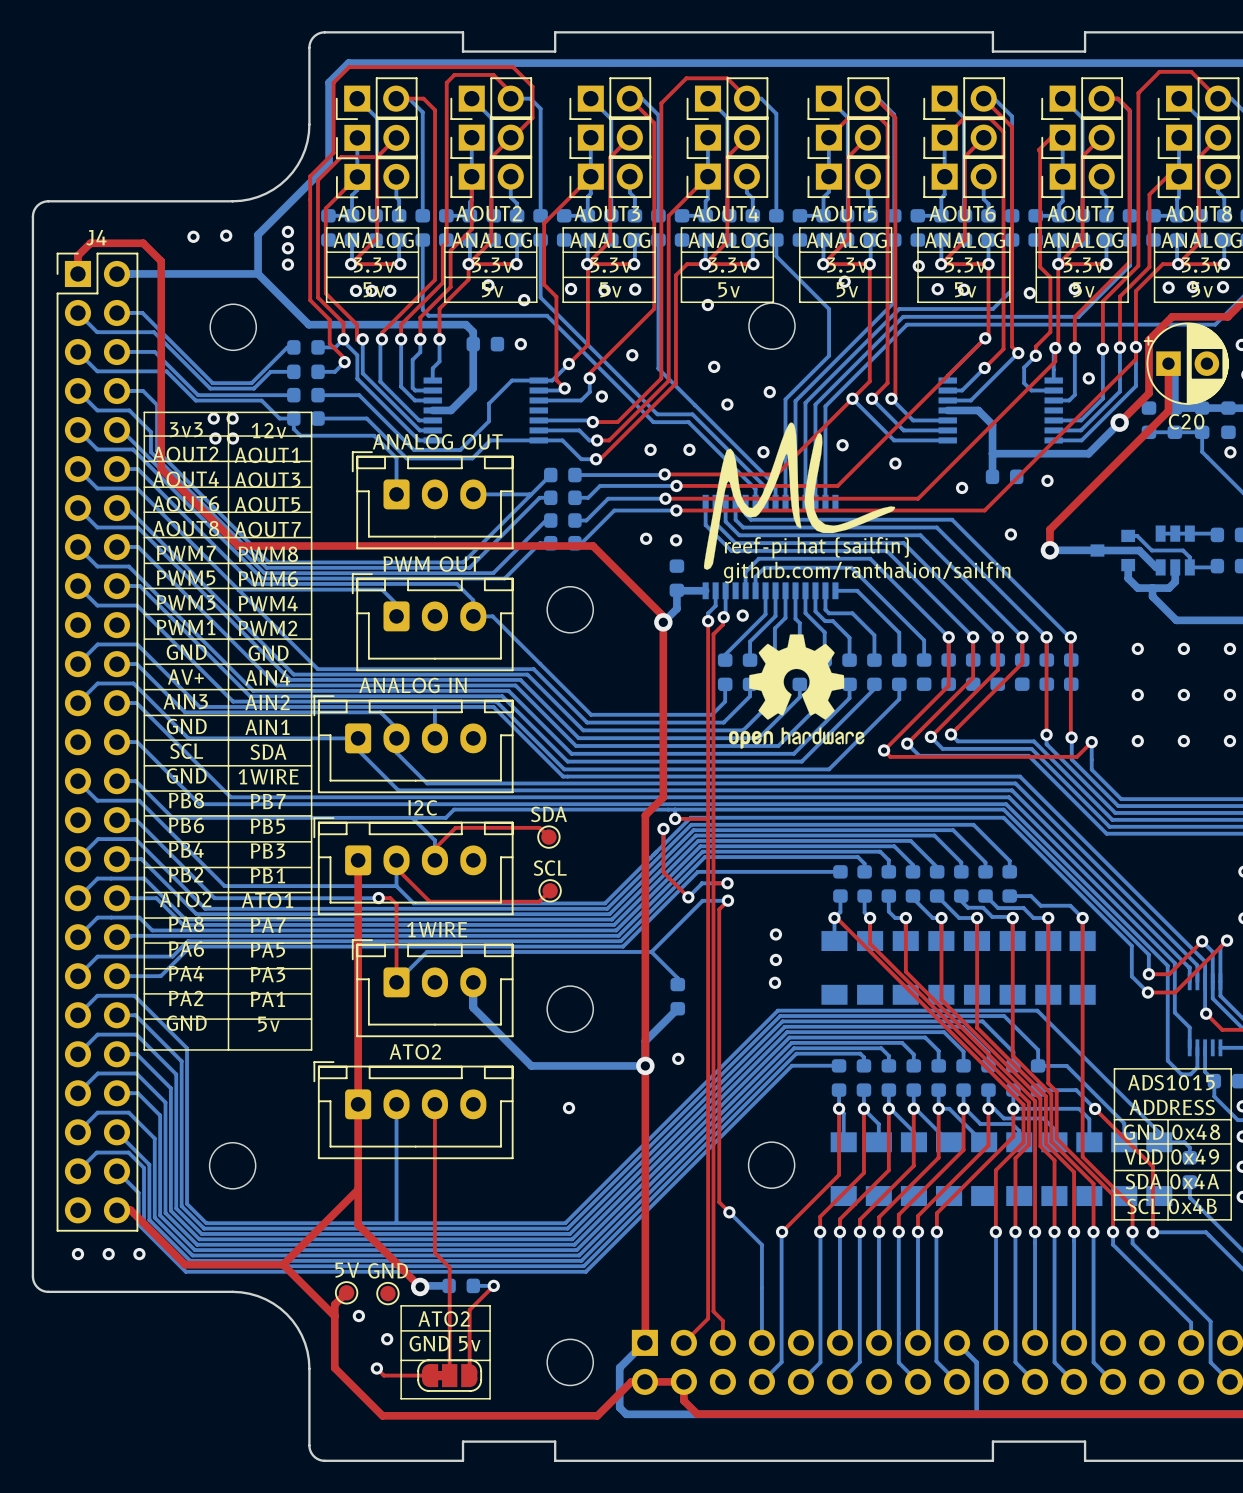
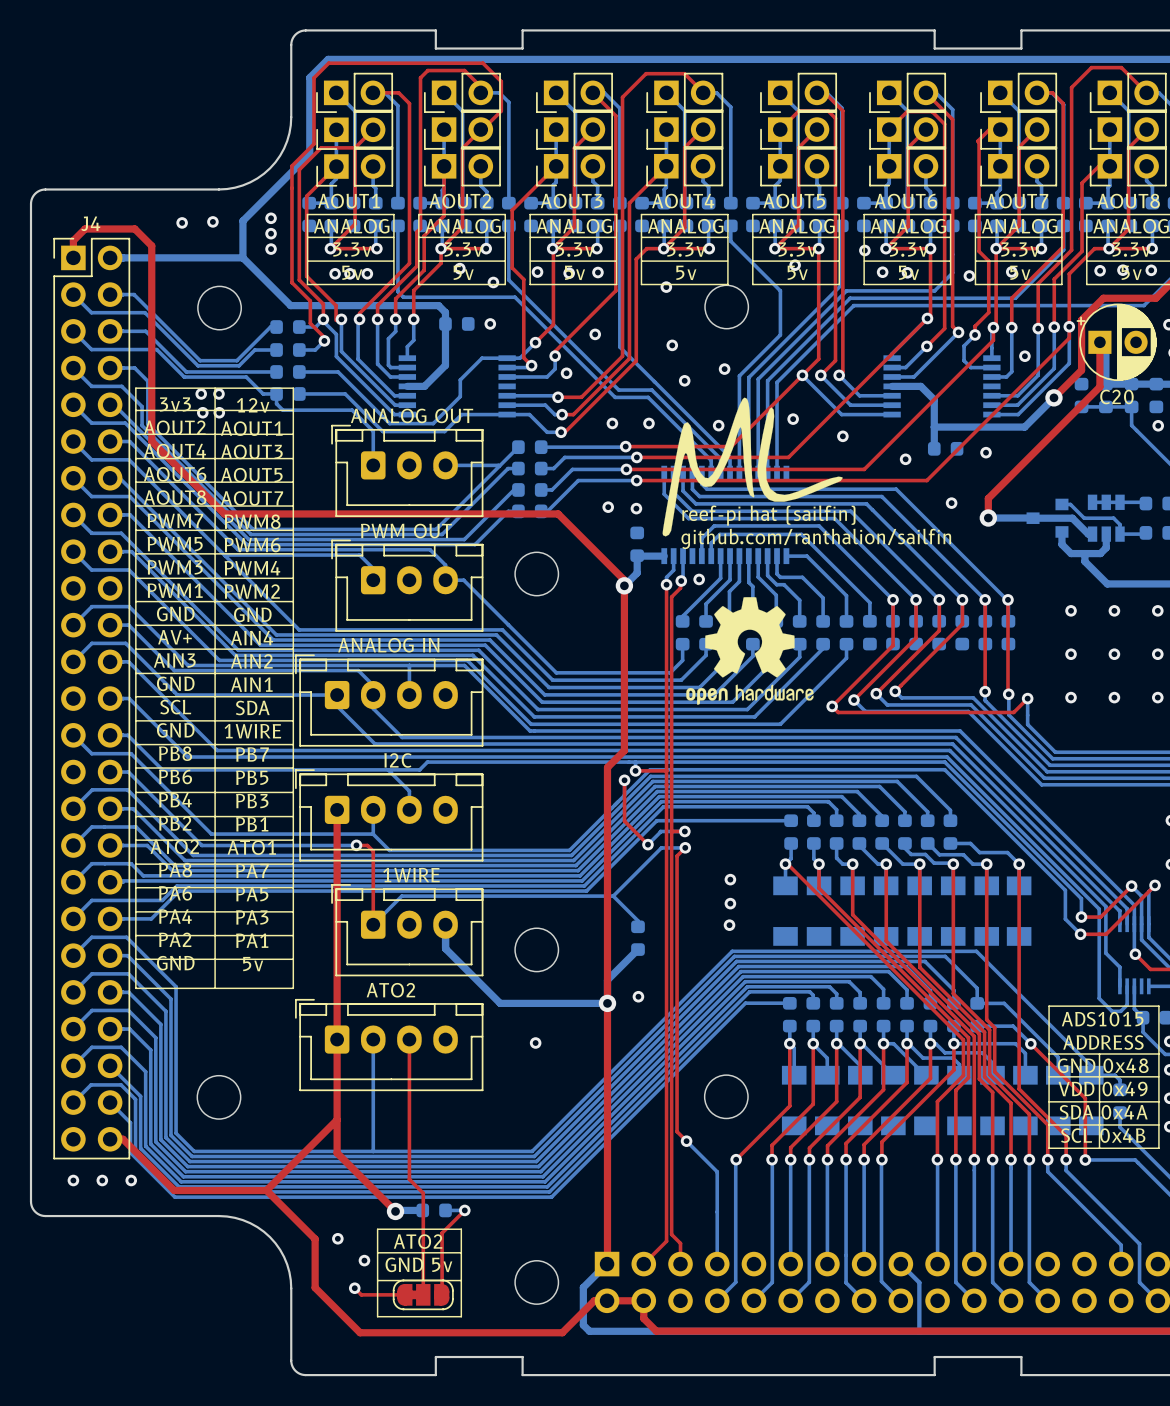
top track: (548, 837) (539, 827) (455, 827) (434, 848) (434, 860) -> none
SDA: (548, 837) -> none
top track: (396, 860) (396, 868) (429, 901) (539, 901) (550, 890) -> none
SCL: (550, 890) -> none
top track: (346, 1292) (334, 1304) (334, 1316) -> none
5V: (346, 1292) -> none
GND: (387, 1293) -> none

